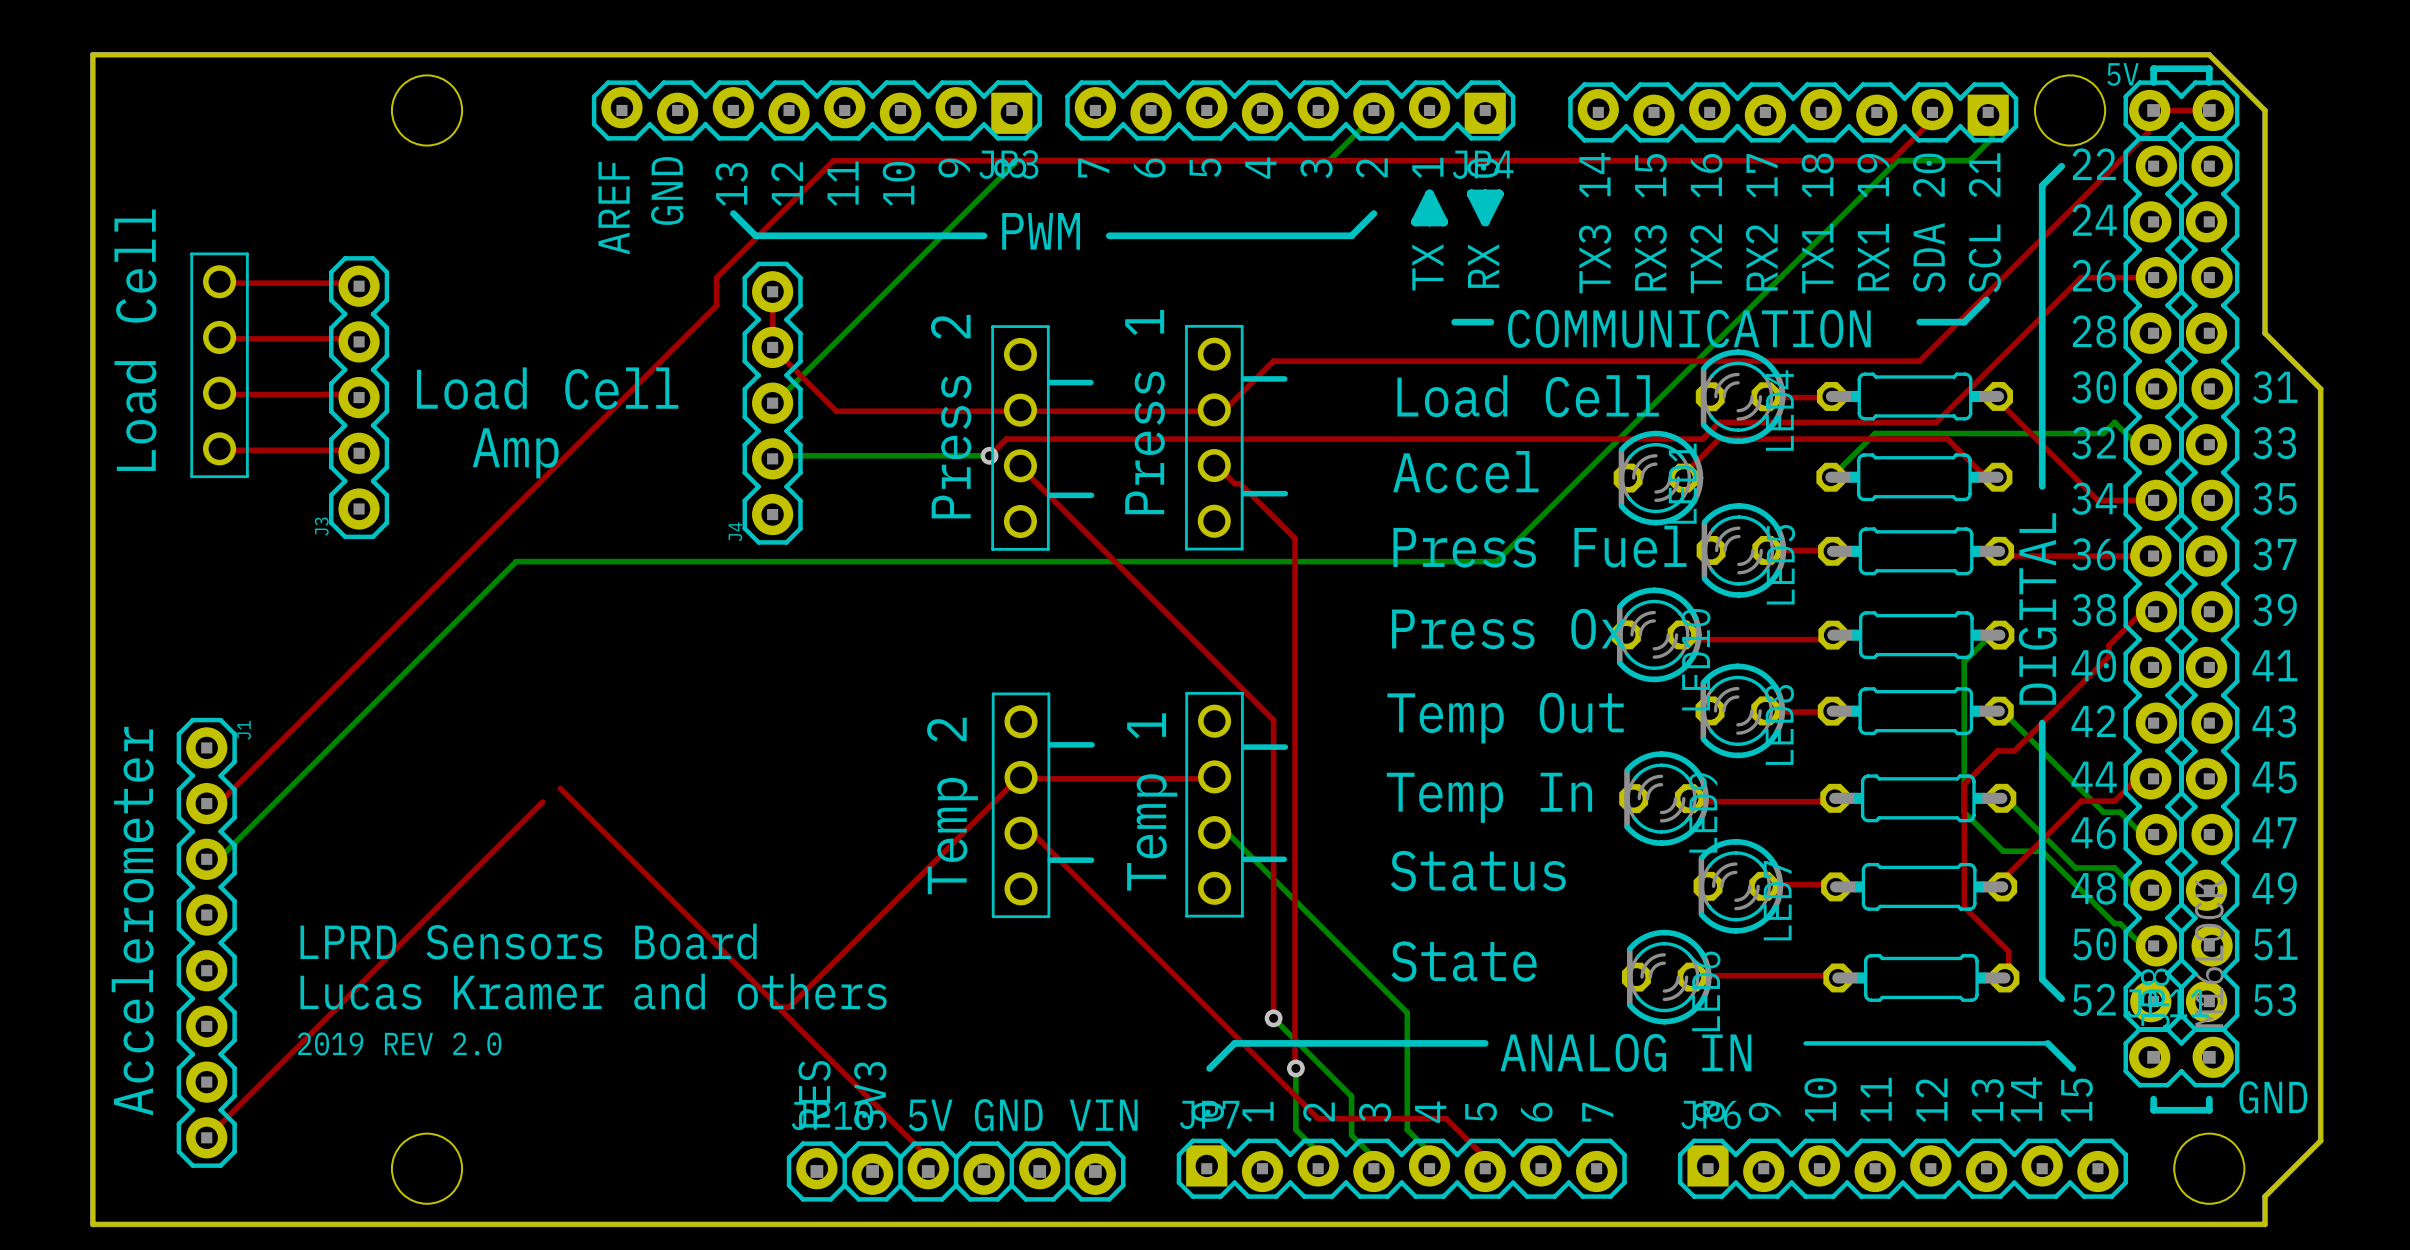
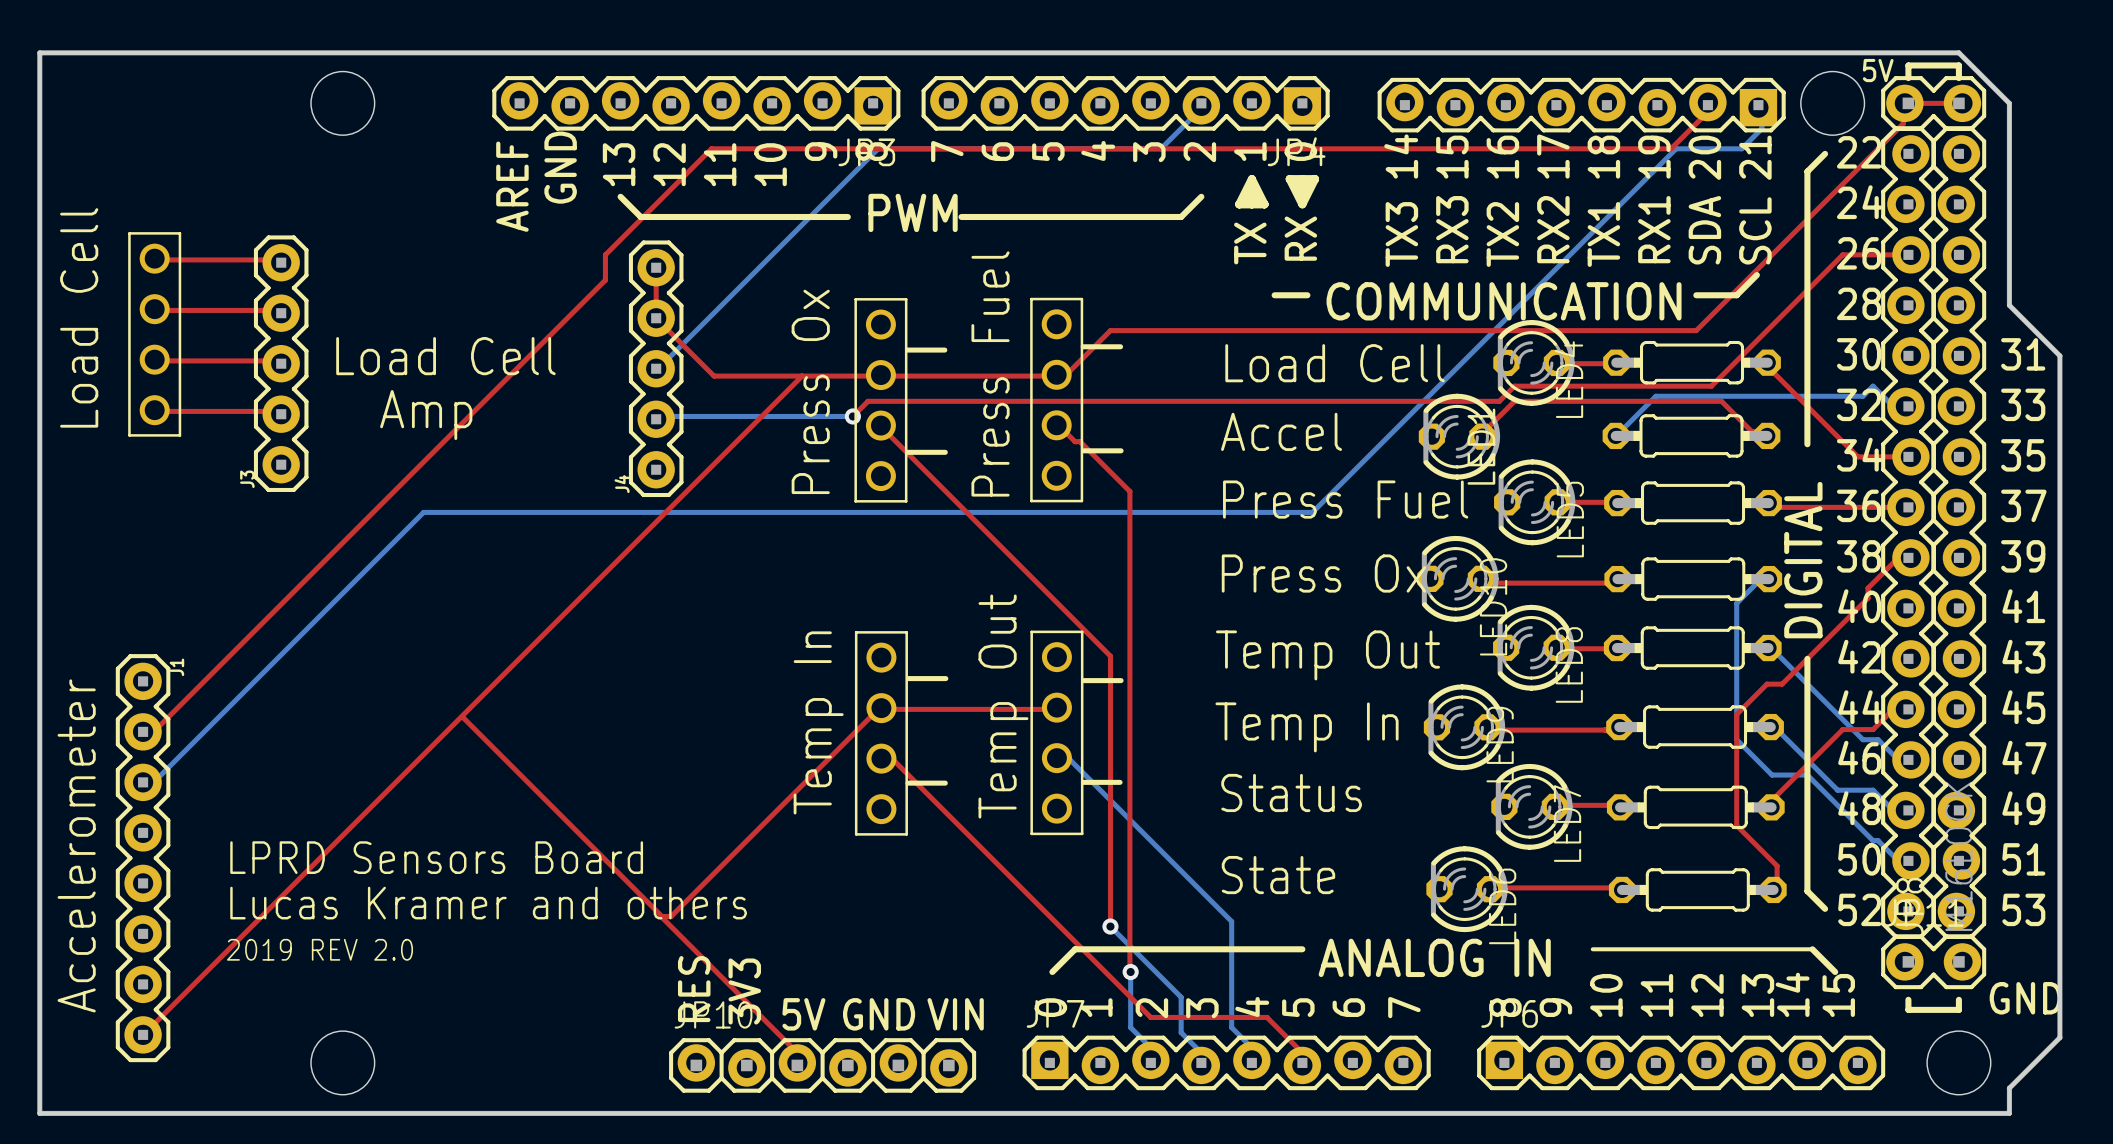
top track: none -> (802, 376) (447, 730)
text: Press 1 (1145, 412) -> Press Fuel (990, 373)
text: Press 2 (951, 416) -> Press Ox (810, 391)
text: Temp 1 (1152, 801) -> Temp Out (1003, 706)
text: Temp 2 (952, 805) -> Temp In (818, 722)

